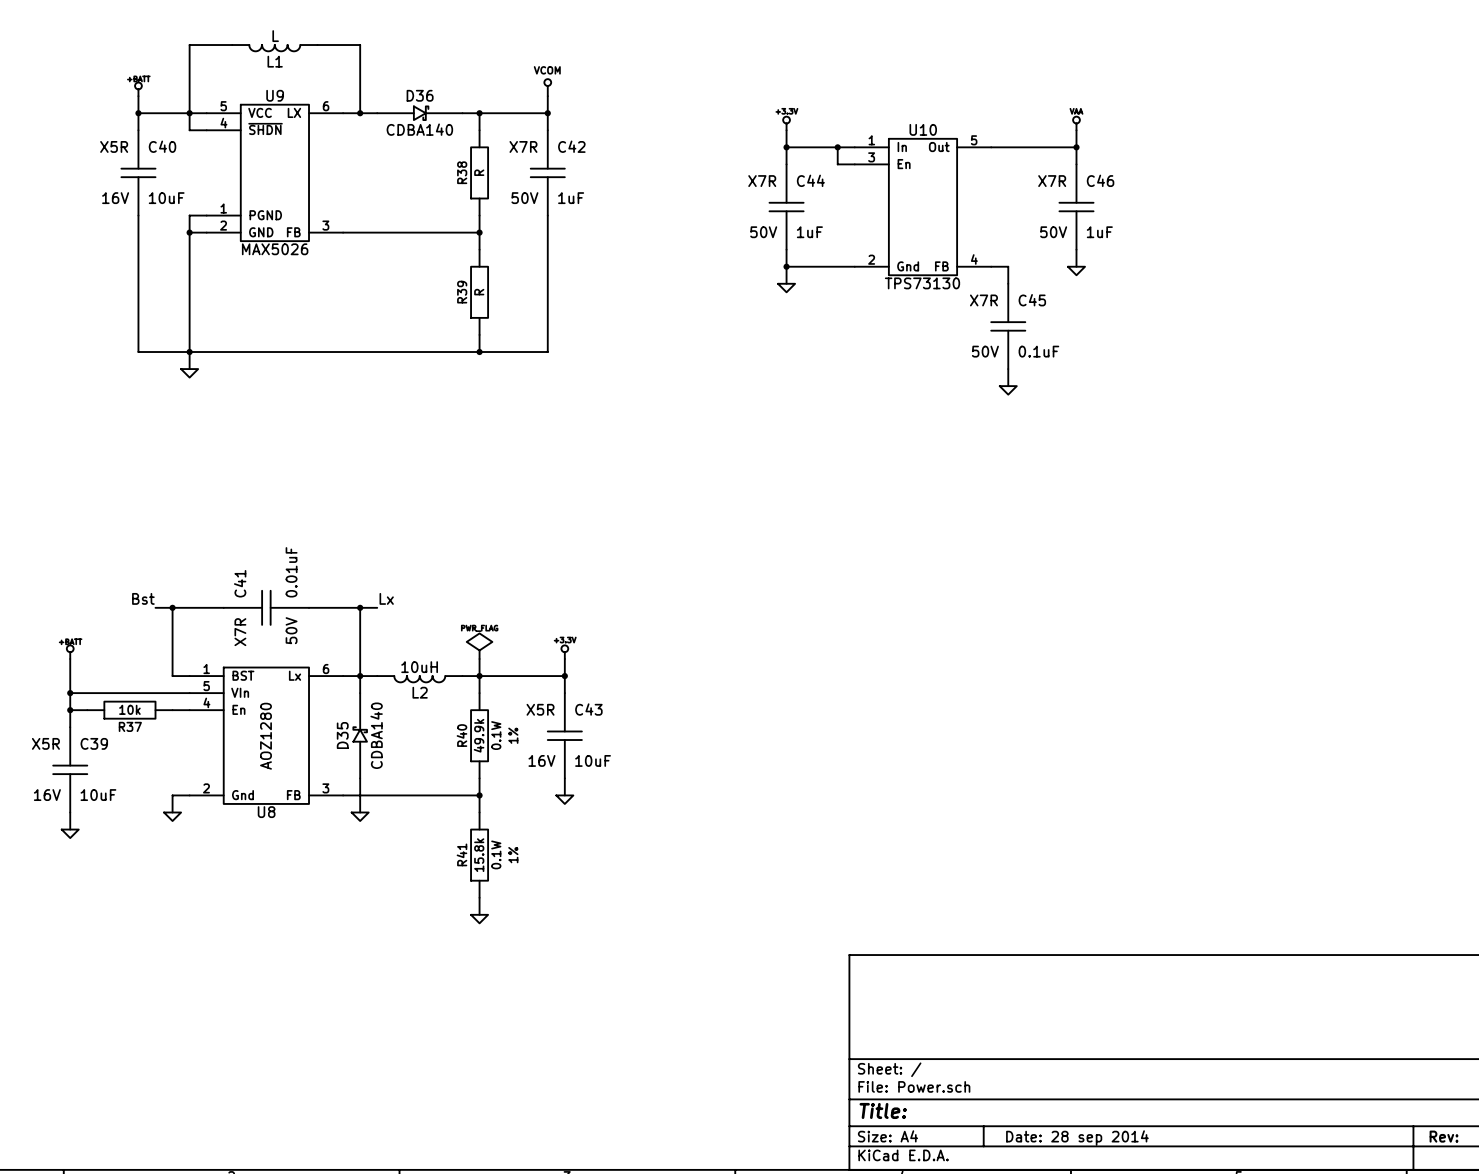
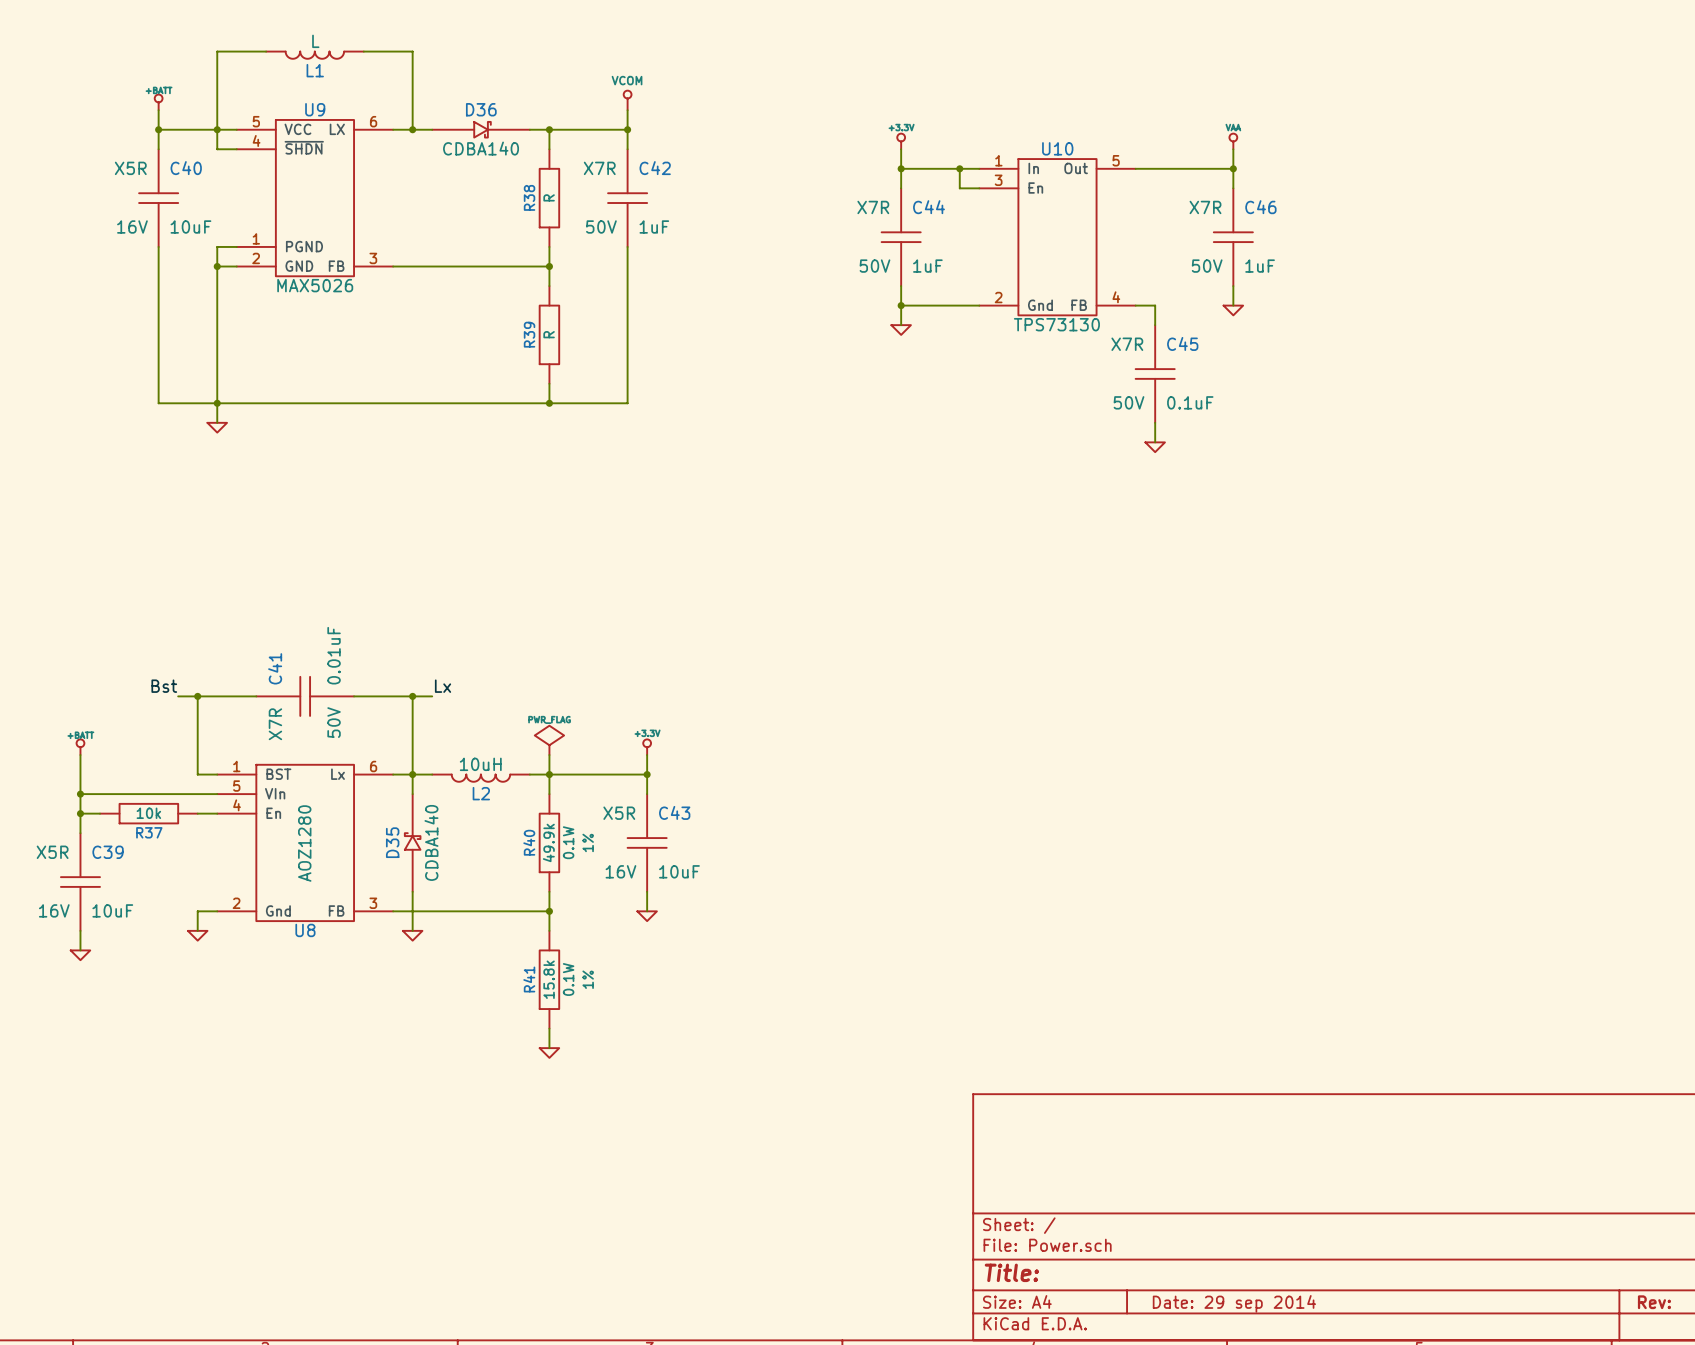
title block: Date: 28 sep 2014 (1077, 1138) -> Date: 29 sep 2014 (1234, 1303)

